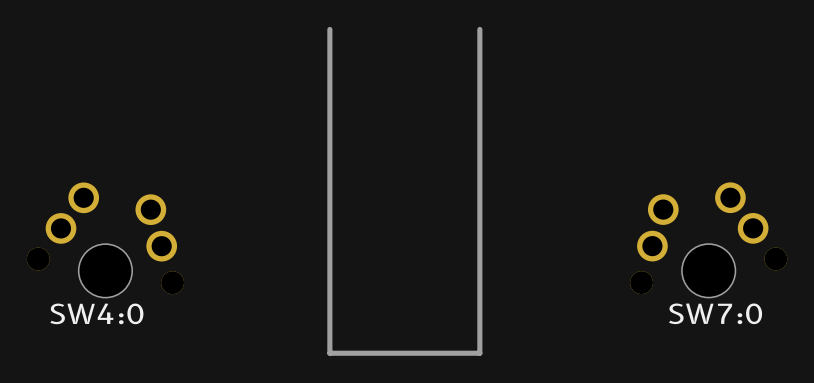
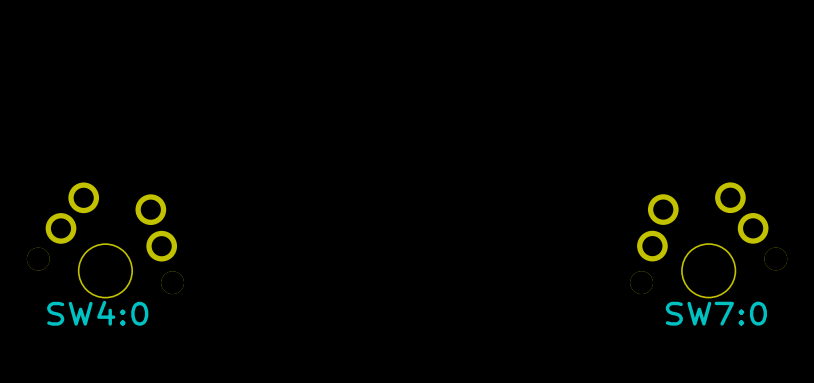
board edge: (329, 29) (329, 353) (479, 353) (479, 29) -> none

